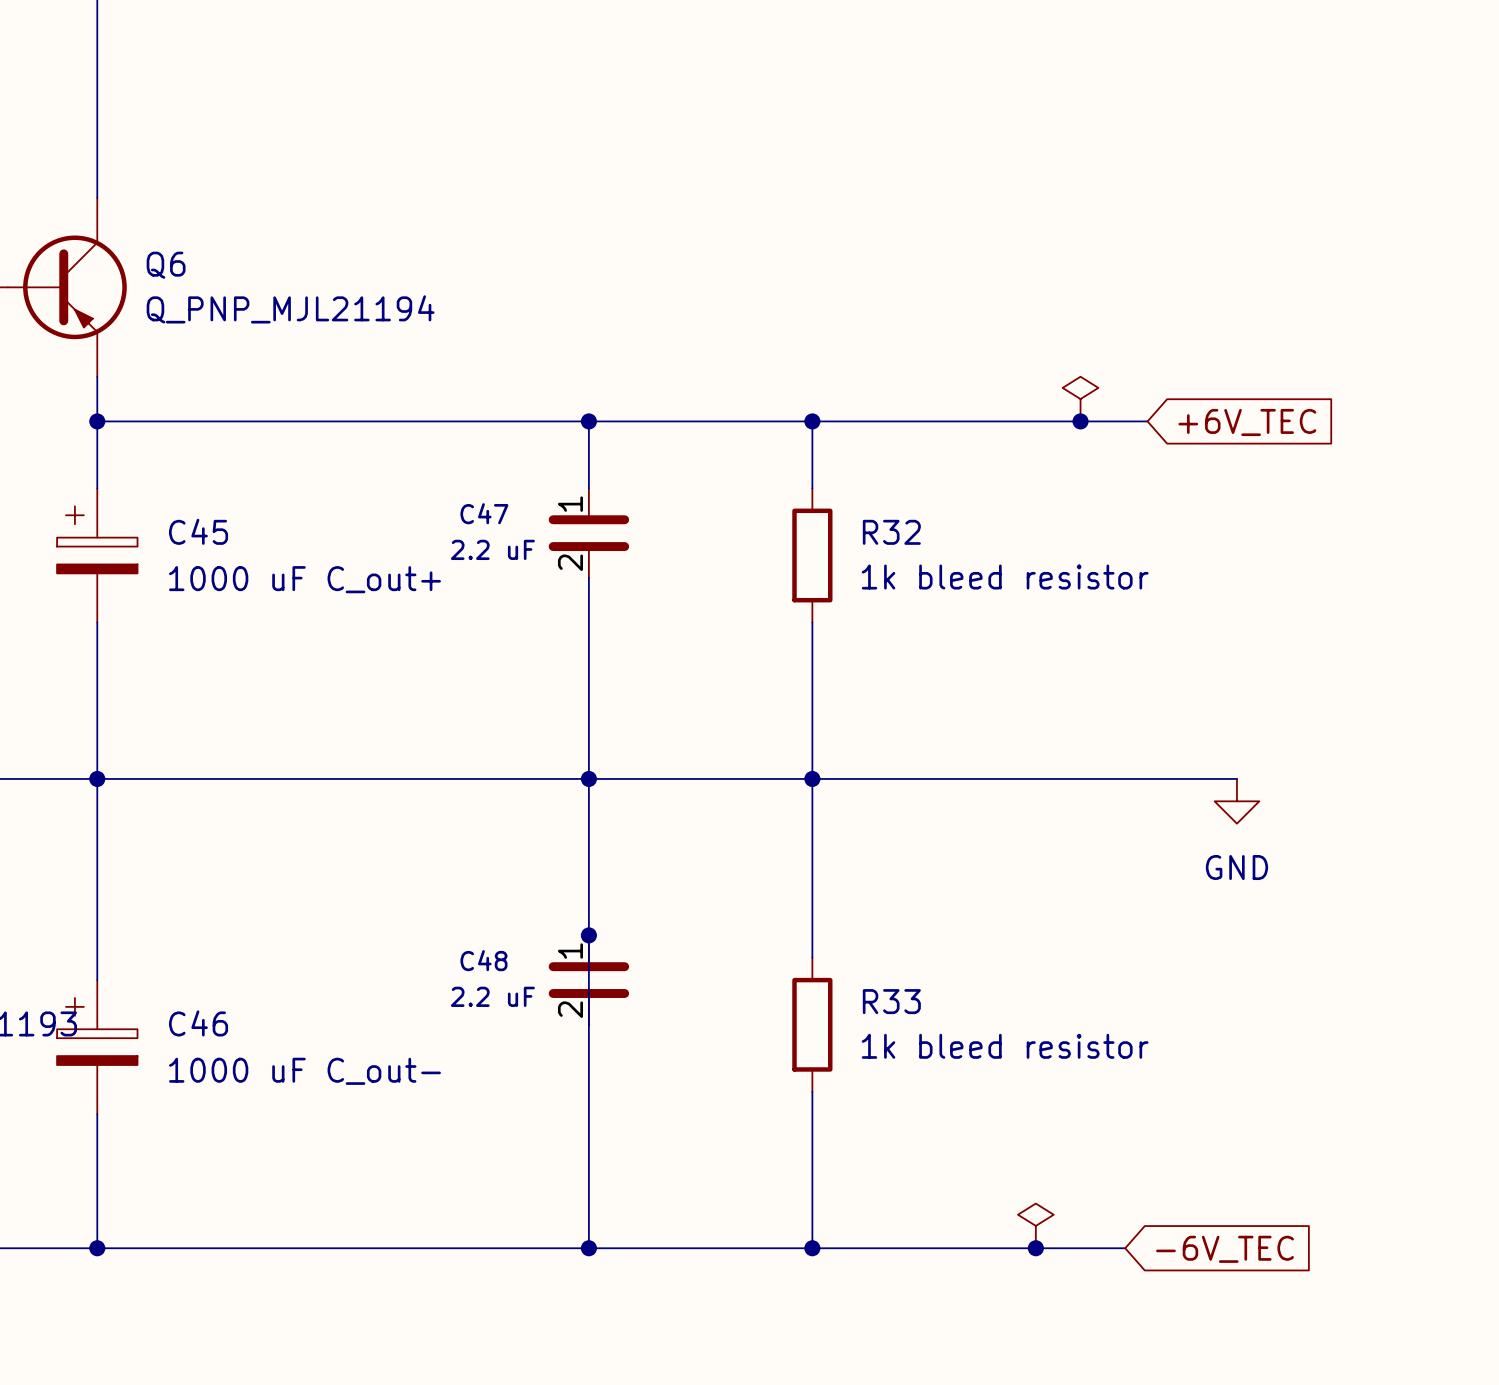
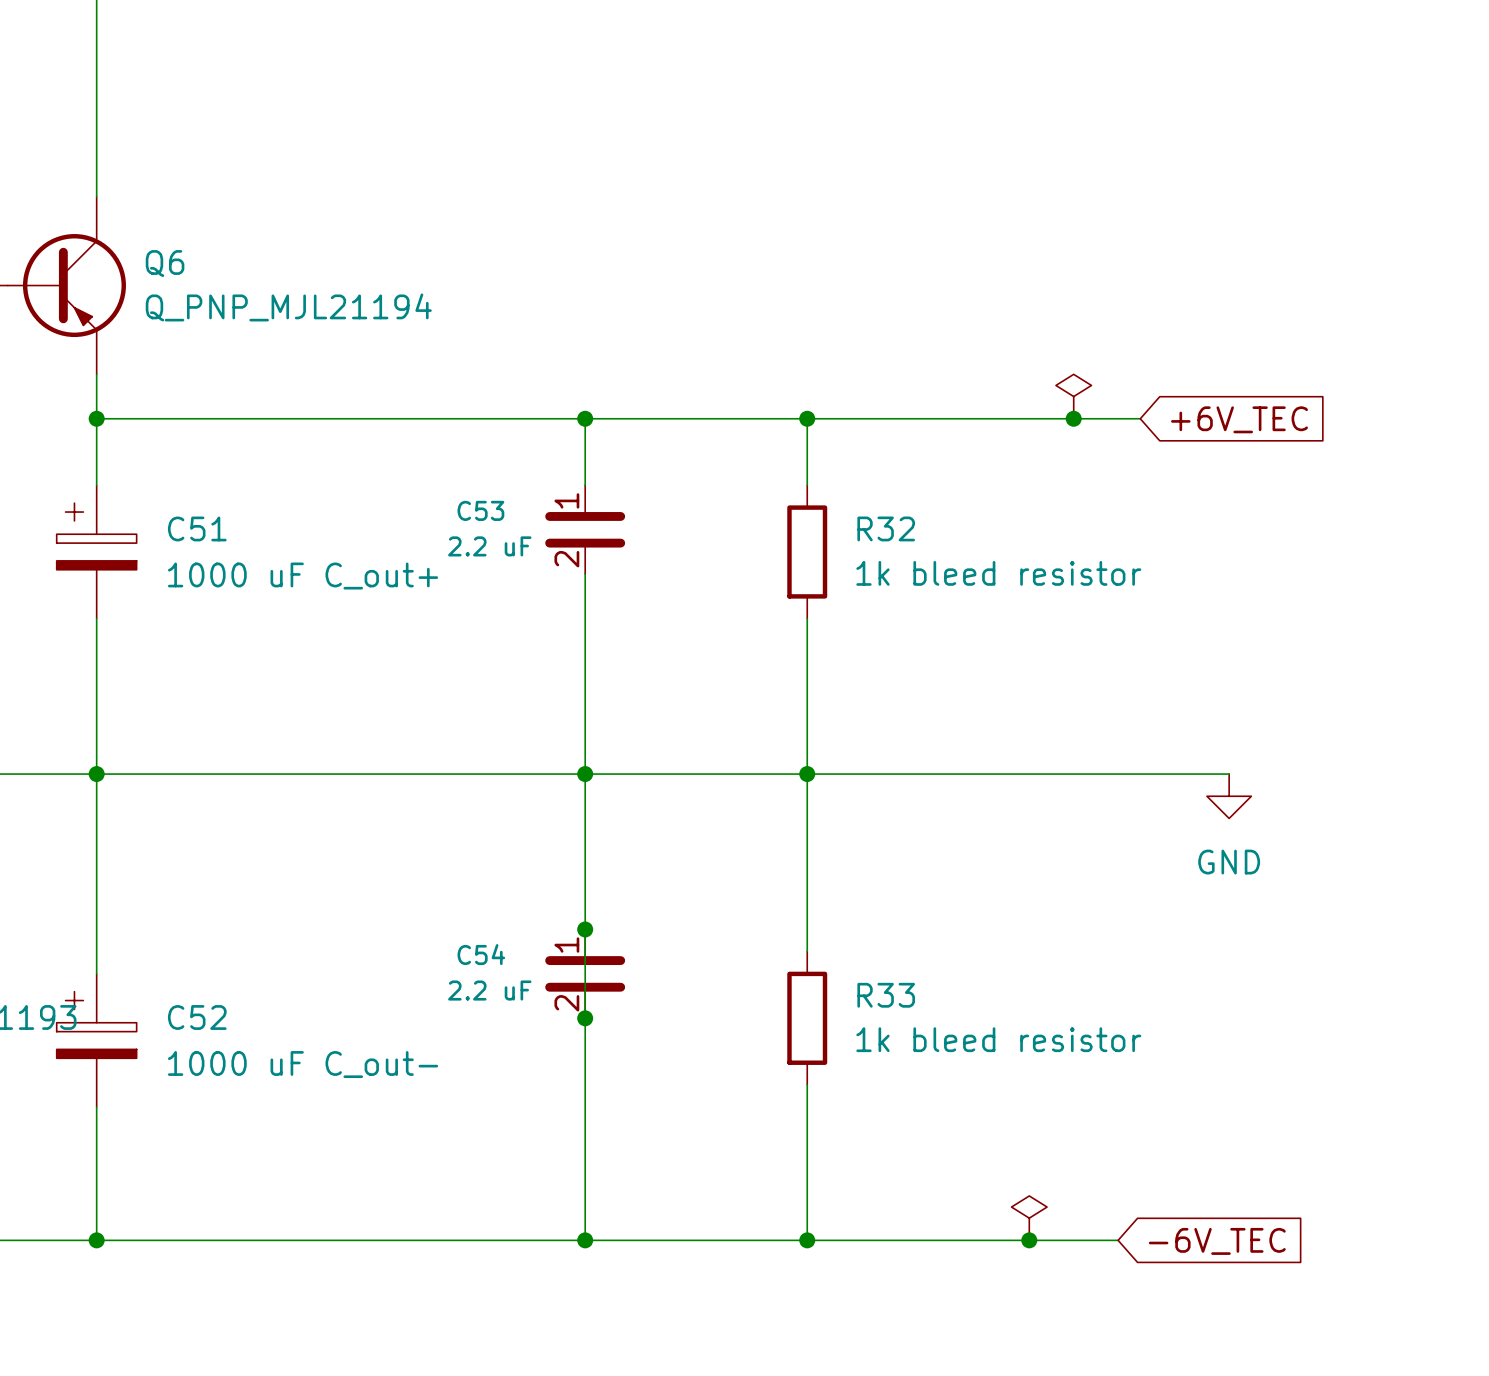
C47 name: C47 (484, 513) -> C53 (480, 510)
C45 name: C45 (198, 531) -> C51 (197, 528)
C48 name: C48 (483, 960) -> C54 (481, 954)
C46 name: C46 (198, 1023) -> C52 (197, 1017)
junction: none -> (585, 1018)

